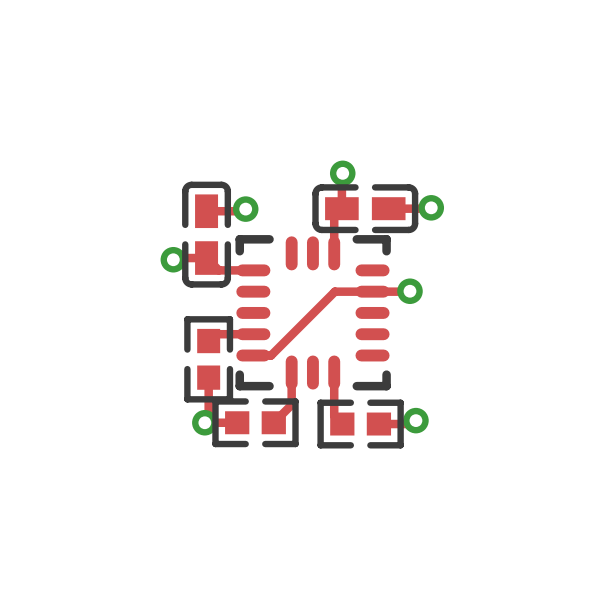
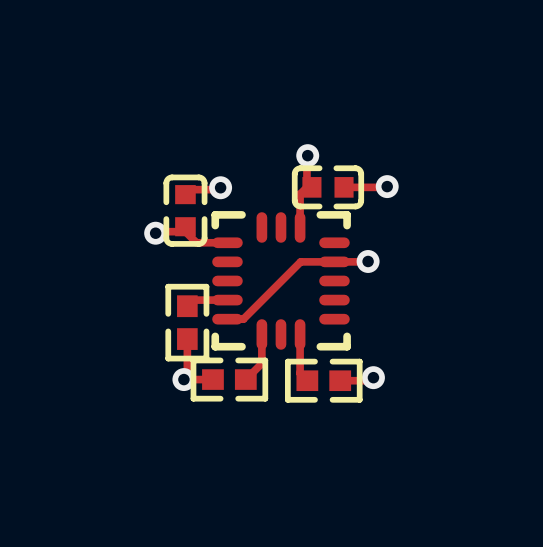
part footprint: [182, 181, 232, 288] -> [163, 174, 208, 247]
part footprint: [312, 184, 419, 234] -> [291, 165, 365, 210]

